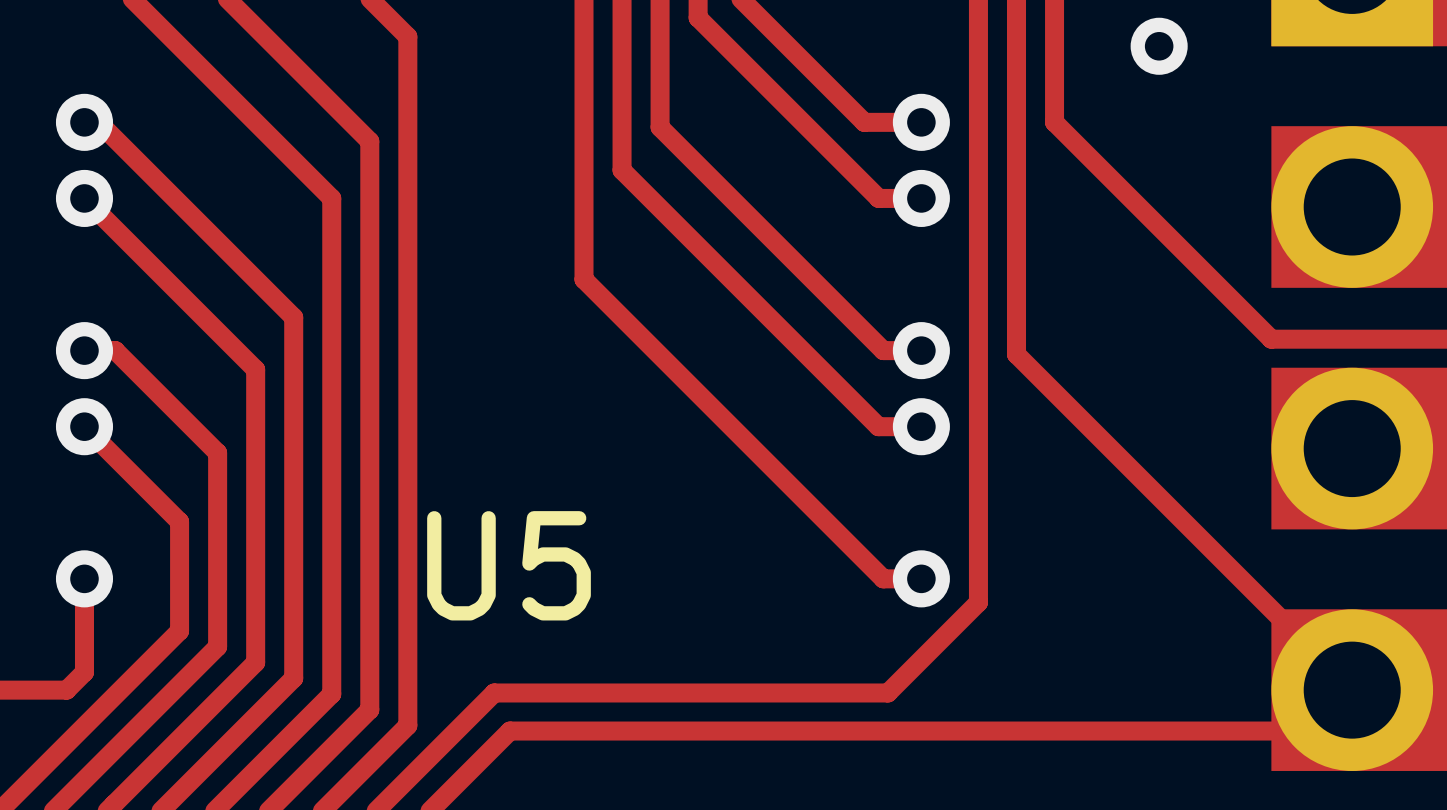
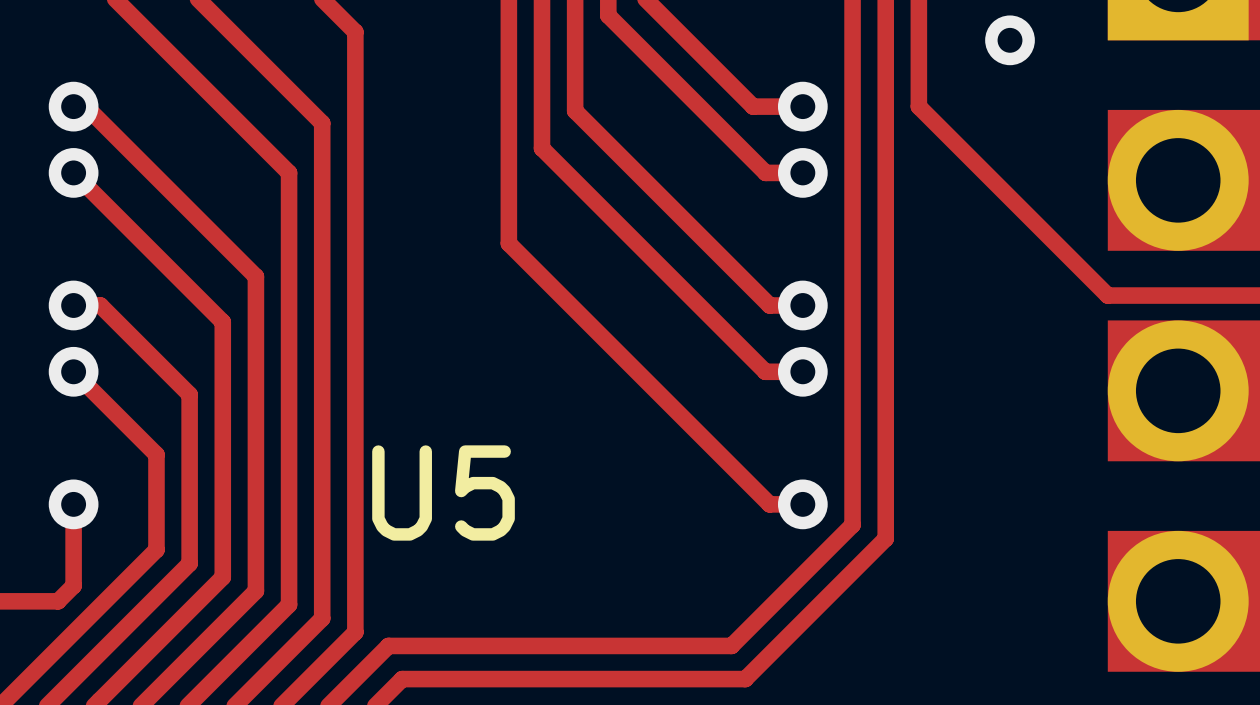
track: (1016, 354) (1352, 690) -> none
track: (887, 692) (494, 692) (445, 741) -> (773, 603) (731, 645) (388, 645)
track: (1311, 731) (509, 731) (461, 779) -> (885, 308) (885, 538) (745, 679) (402, 679)

